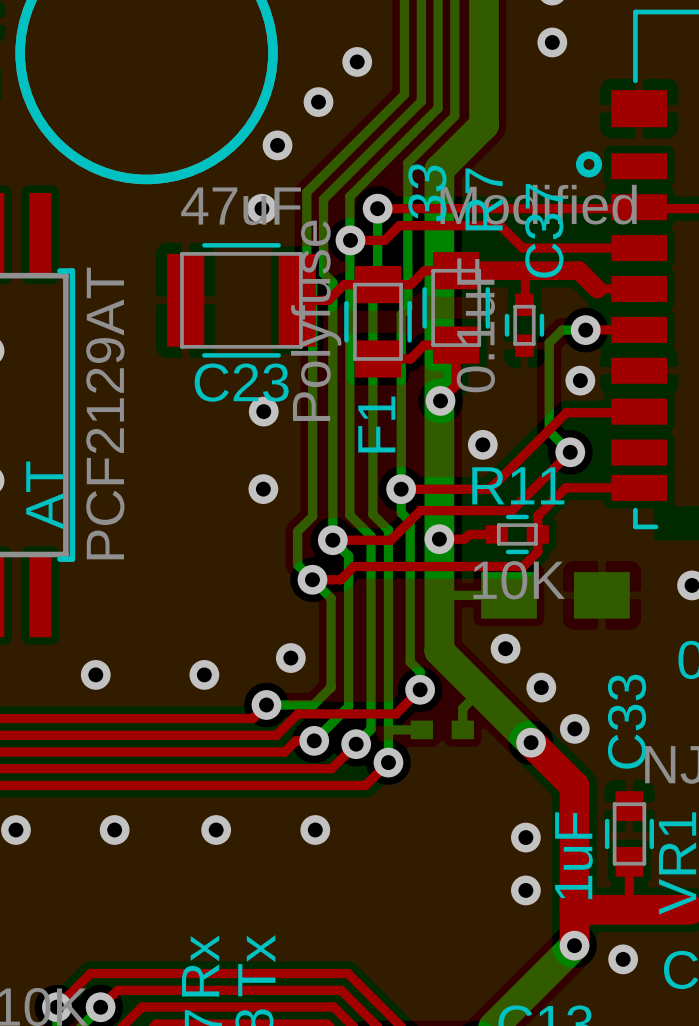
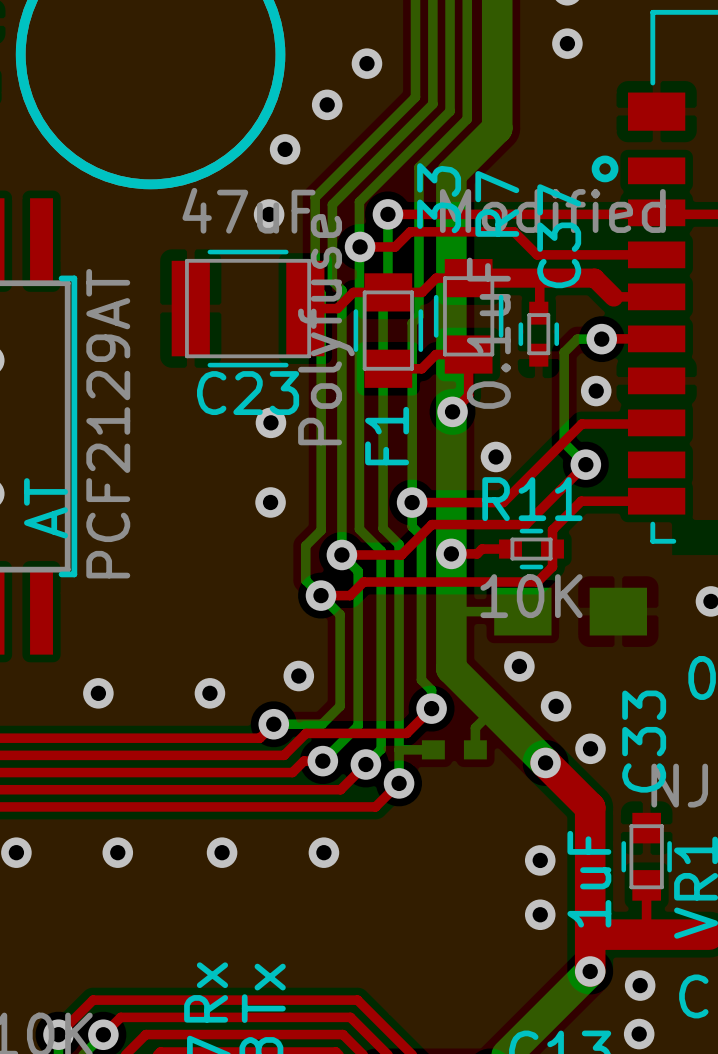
via: none -> (639, 1034)

